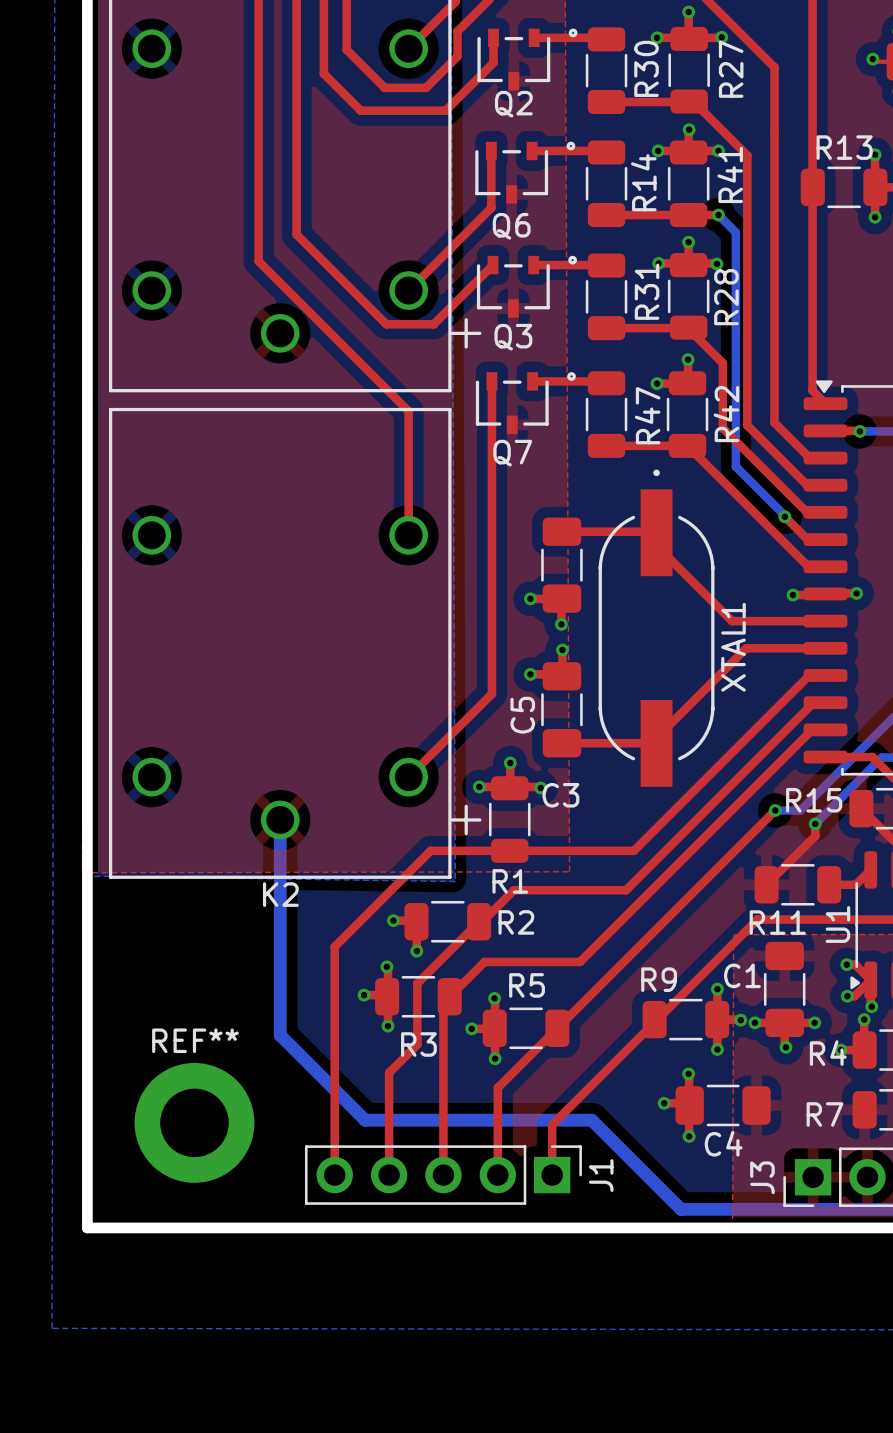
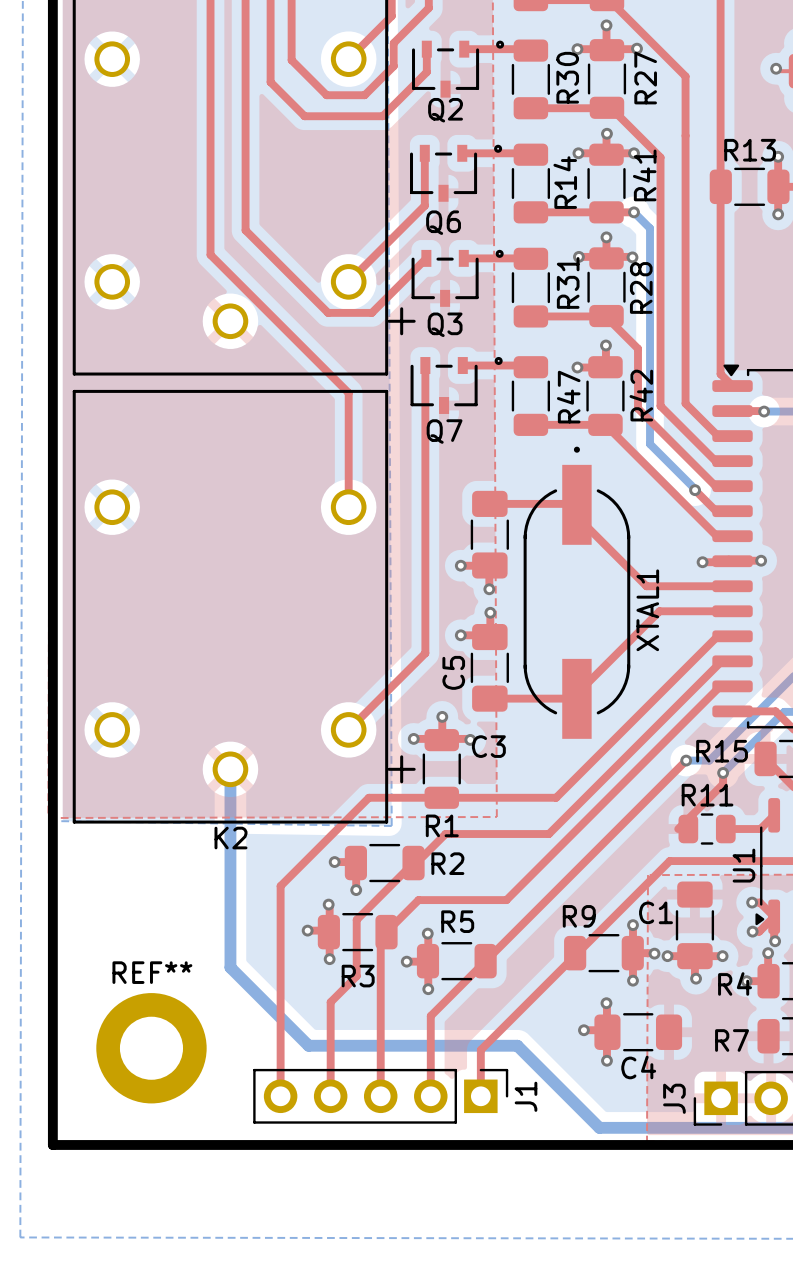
R11 footprint: [754, 864, 842, 906] -> [678, 813, 736, 845]
R11 name position: R11 (777, 922) -> R11 (707, 795)

